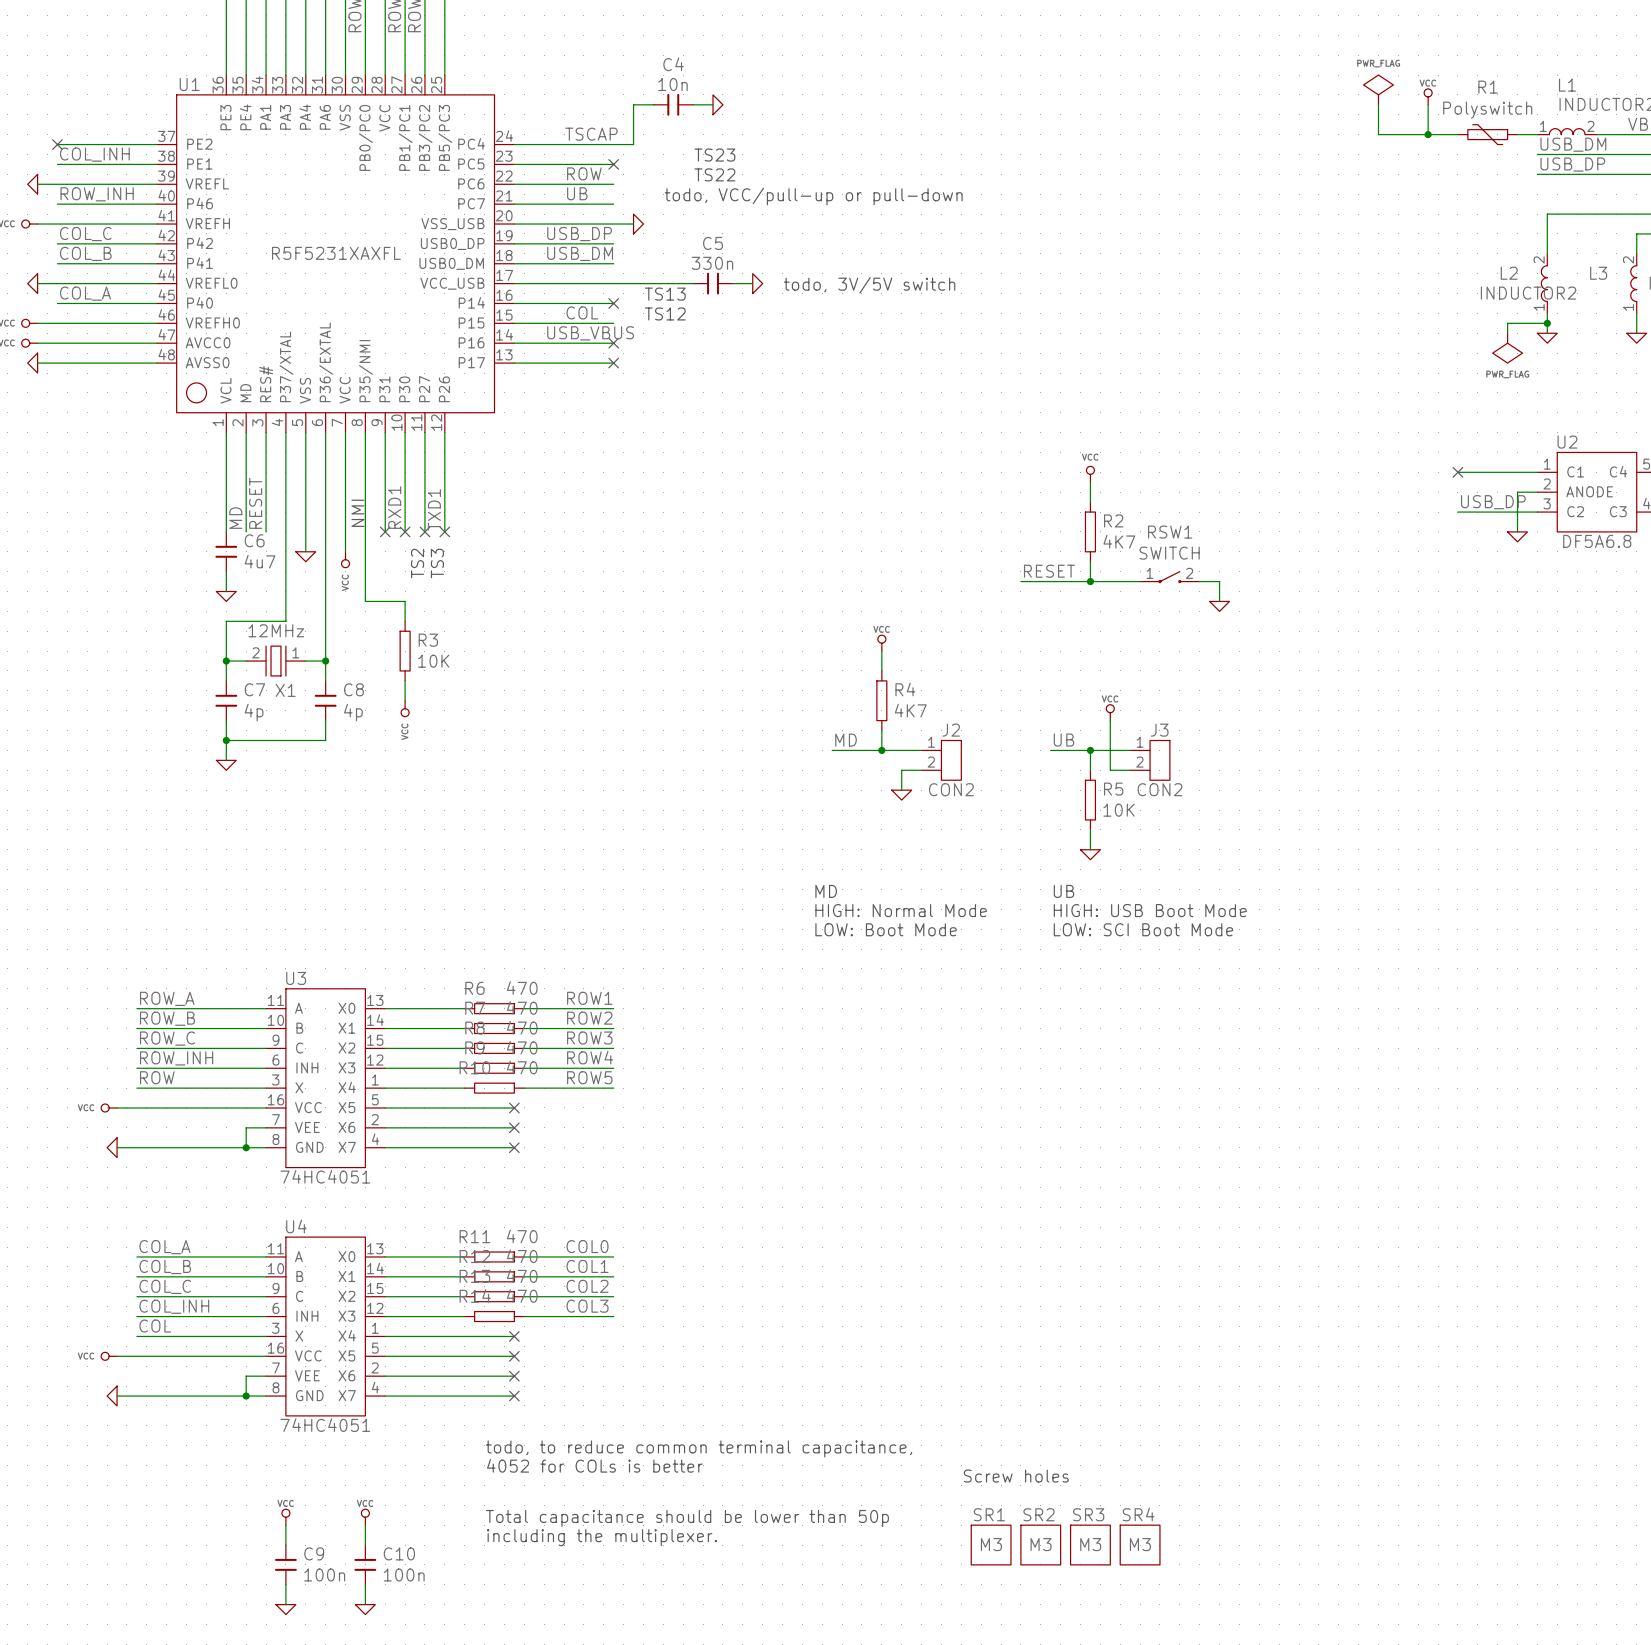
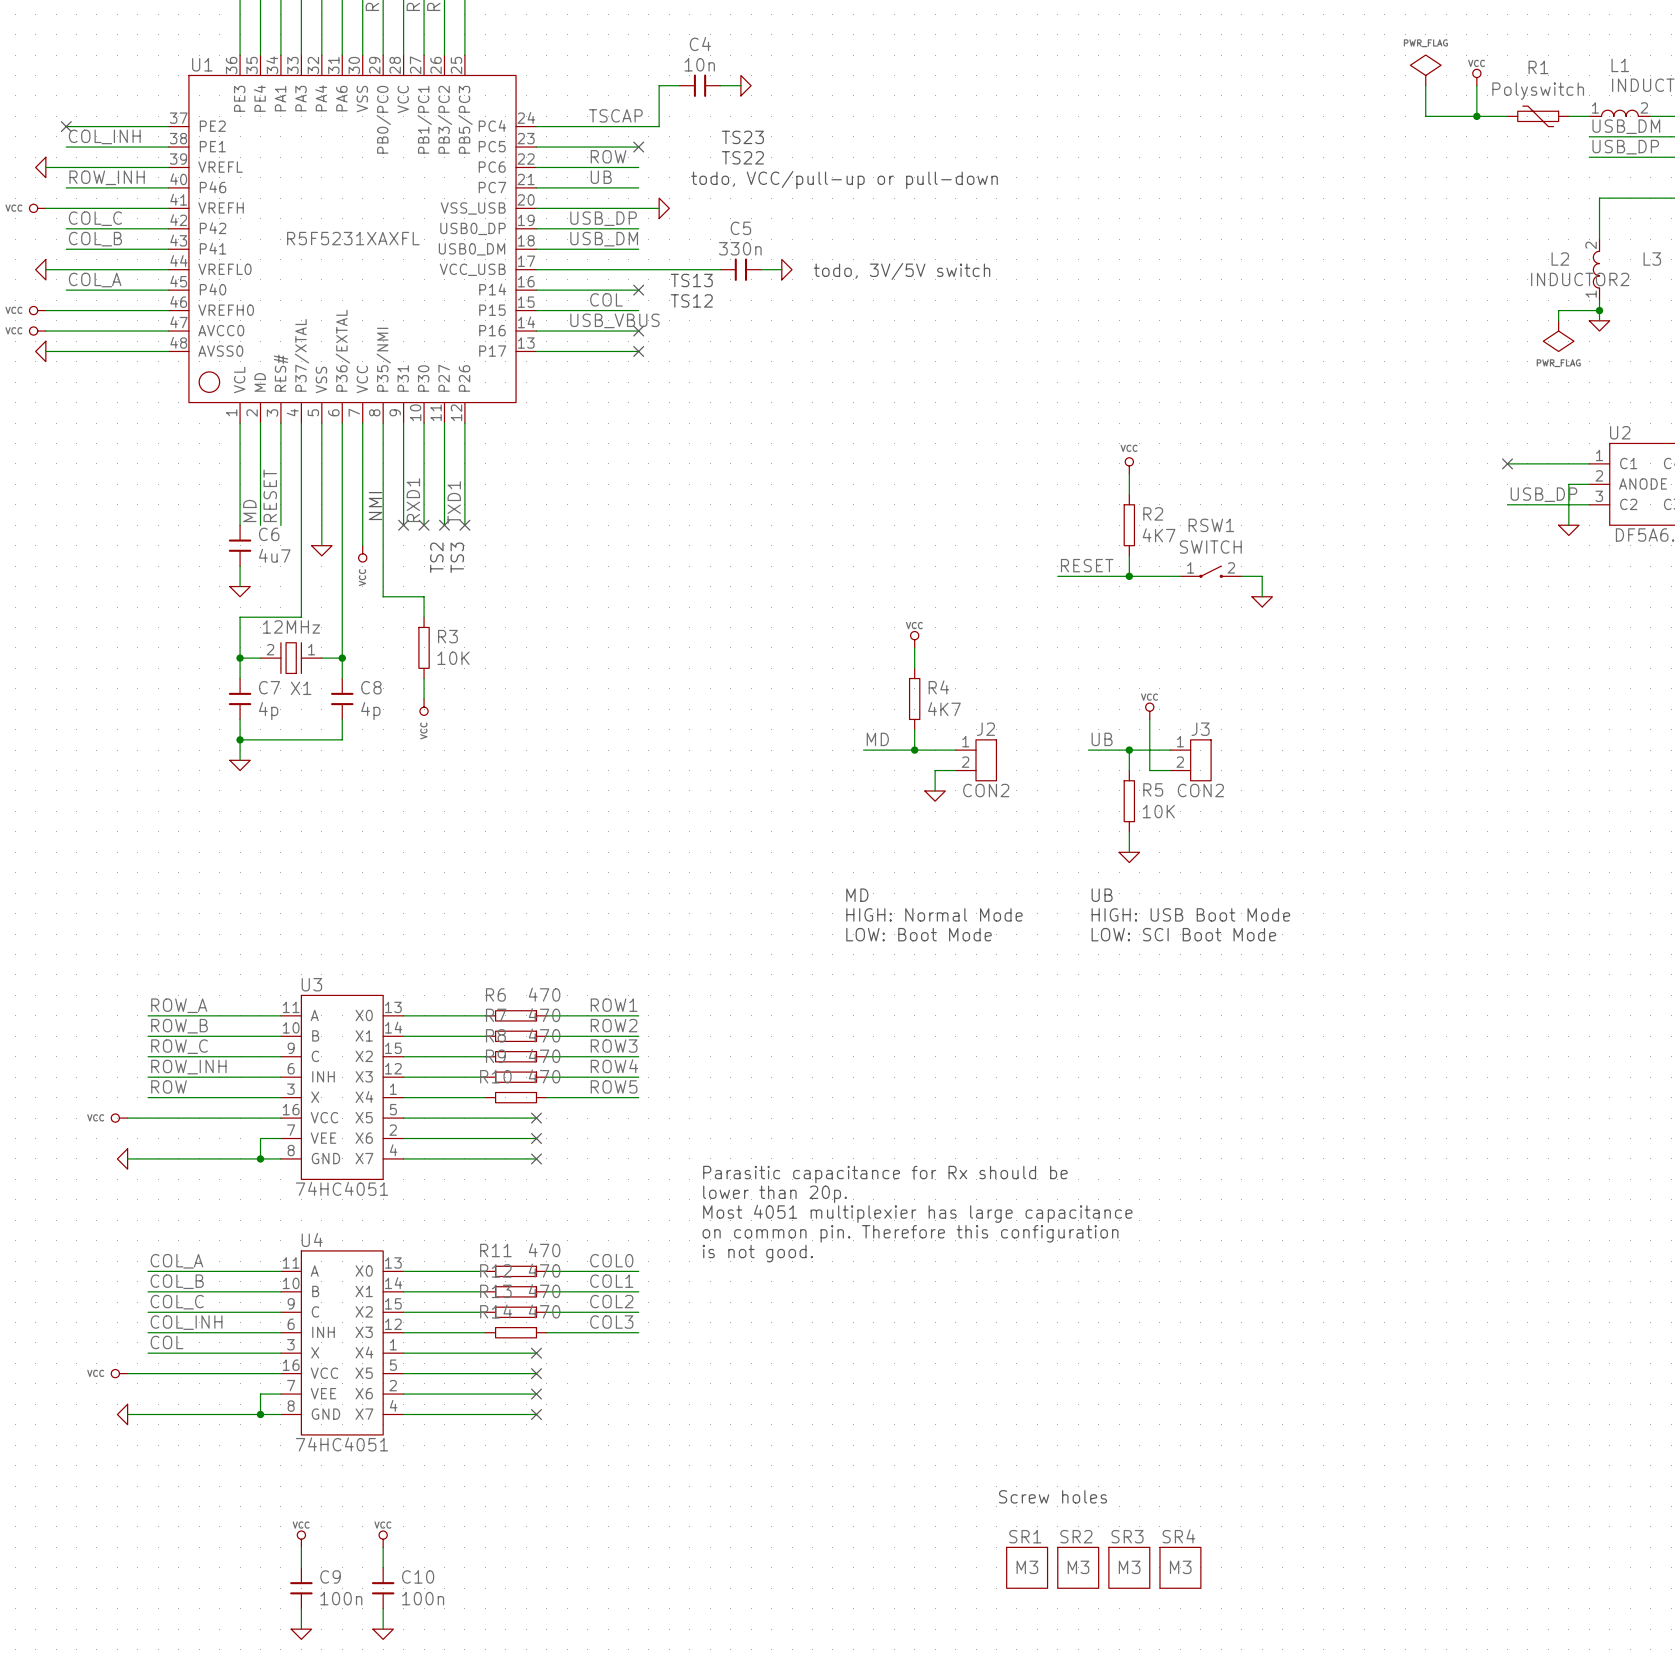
text: none -> Parasitic capacitance for Rx should be (885, 1174)
text: none -> lower than 20p. (775, 1194)
text: none -> Most 4051 multiplexier has large capacitance (917, 1213)
text: none -> on common pin. Therefore this configuration (910, 1233)
text: none -> is not good. (757, 1253)
text: todo, to reduce common terminal capacitance, (699, 1448) -> none
text: 4052 for COLs is better (594, 1465) -> none
text: Total capacitance should be lower than 50p (687, 1518) -> none
text: including the multiplexer. (601, 1537) -> none

